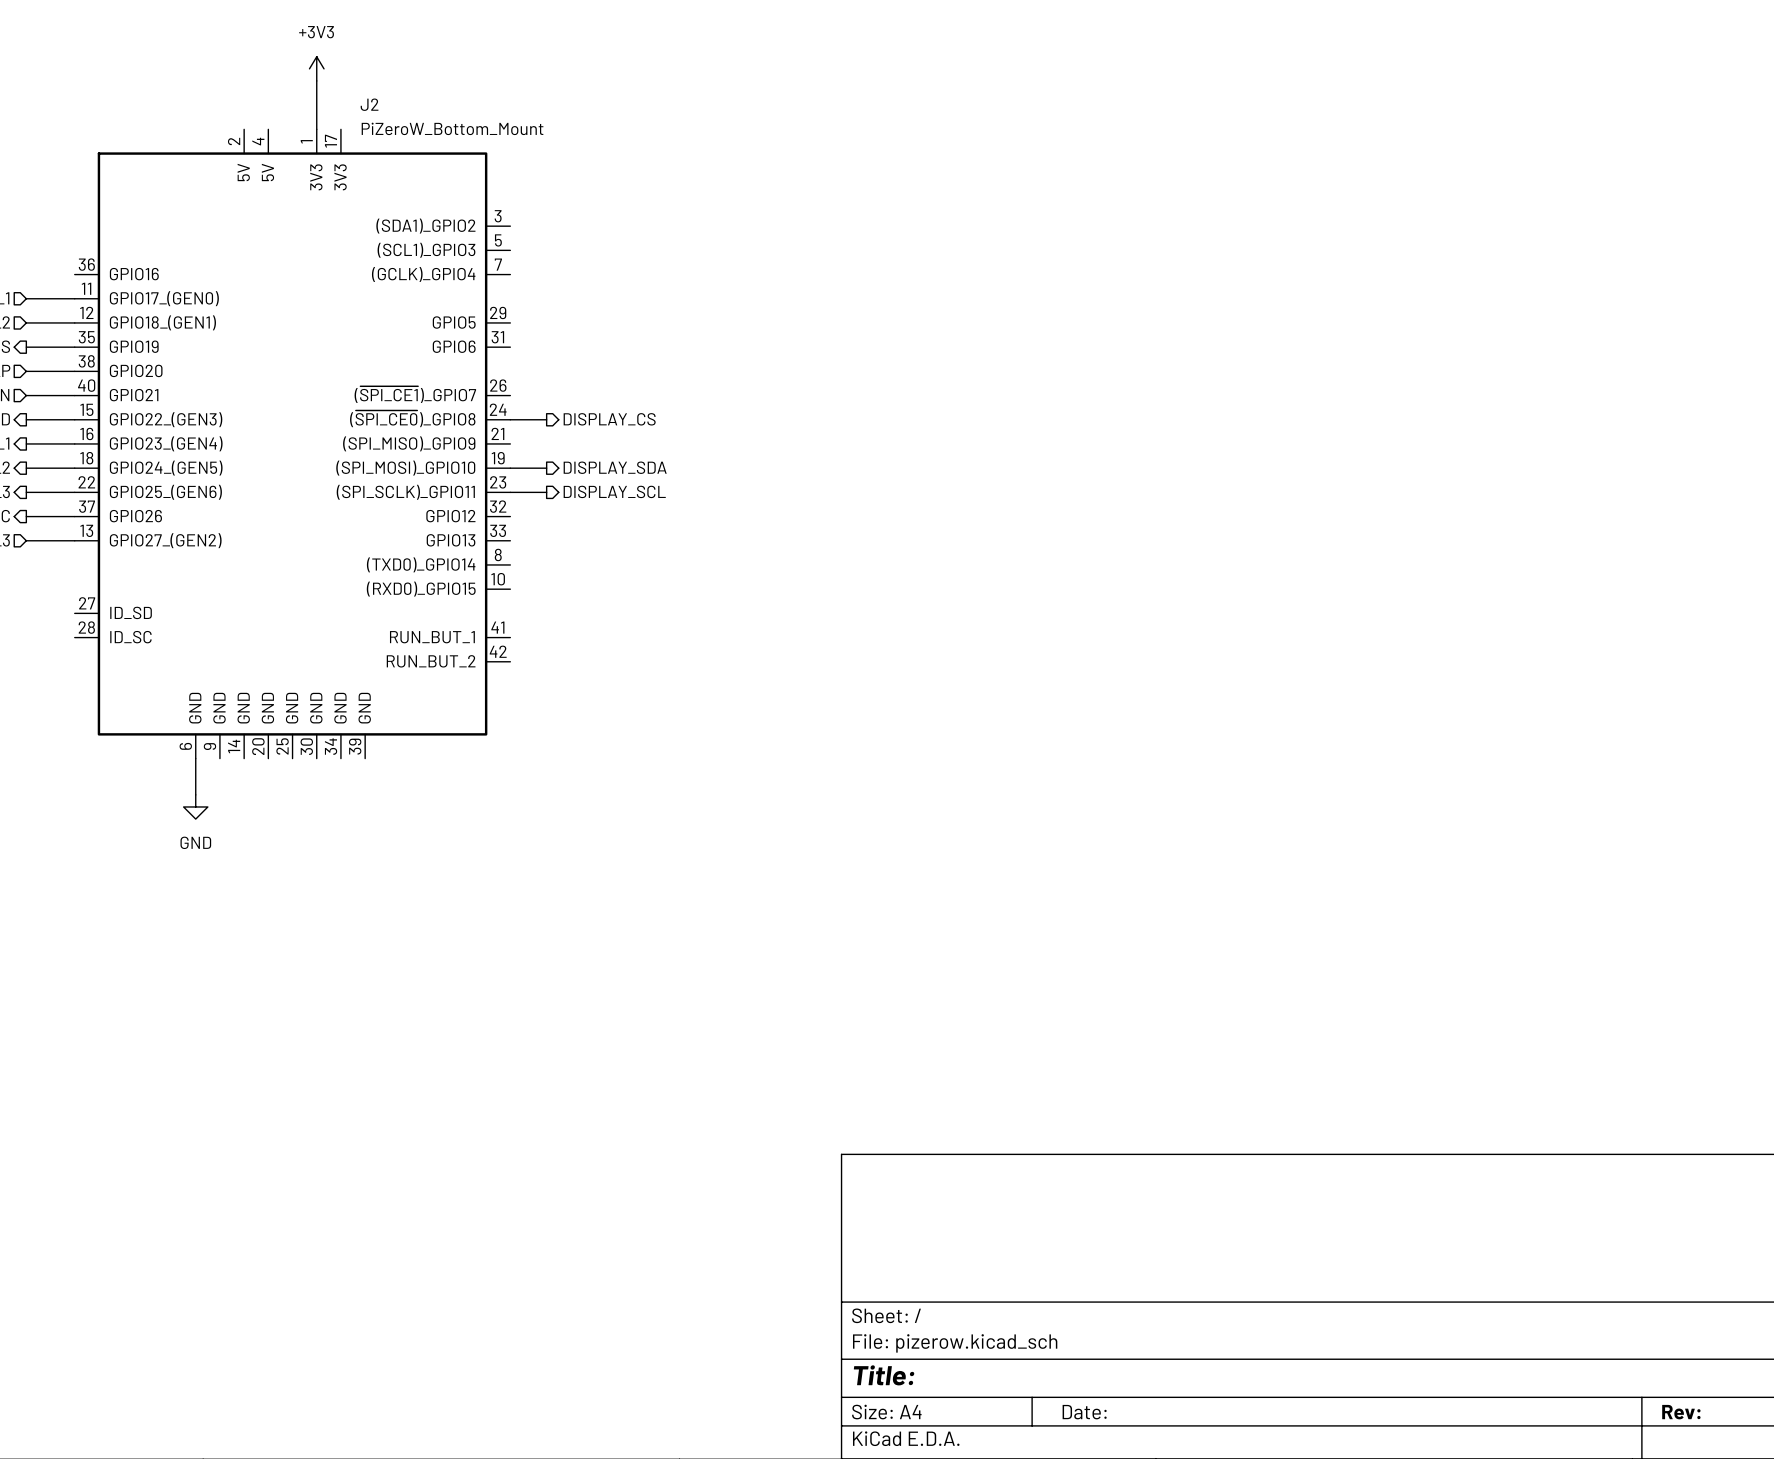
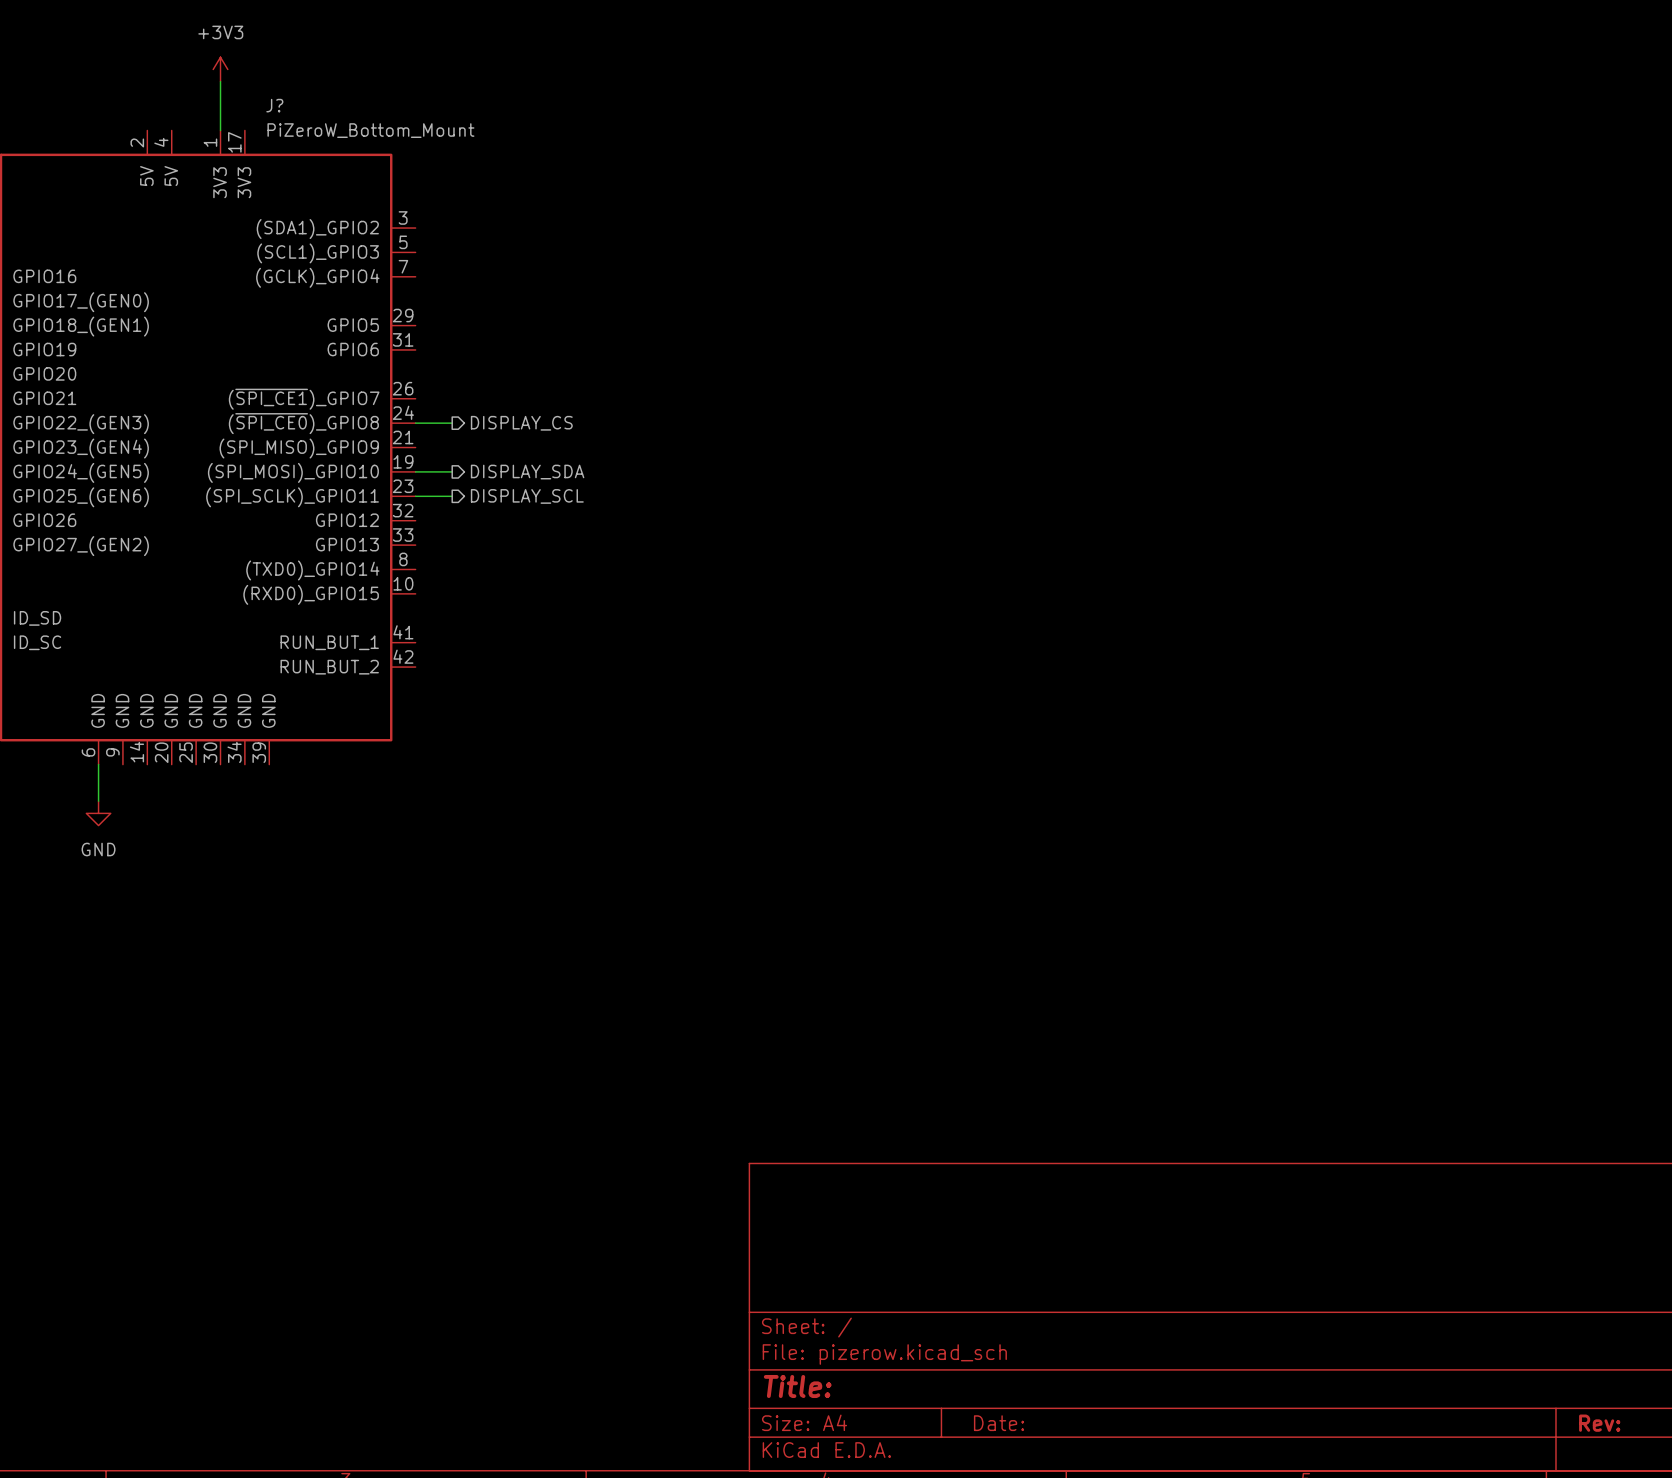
J2 name: J2 (369, 104) -> J? (274, 105)

